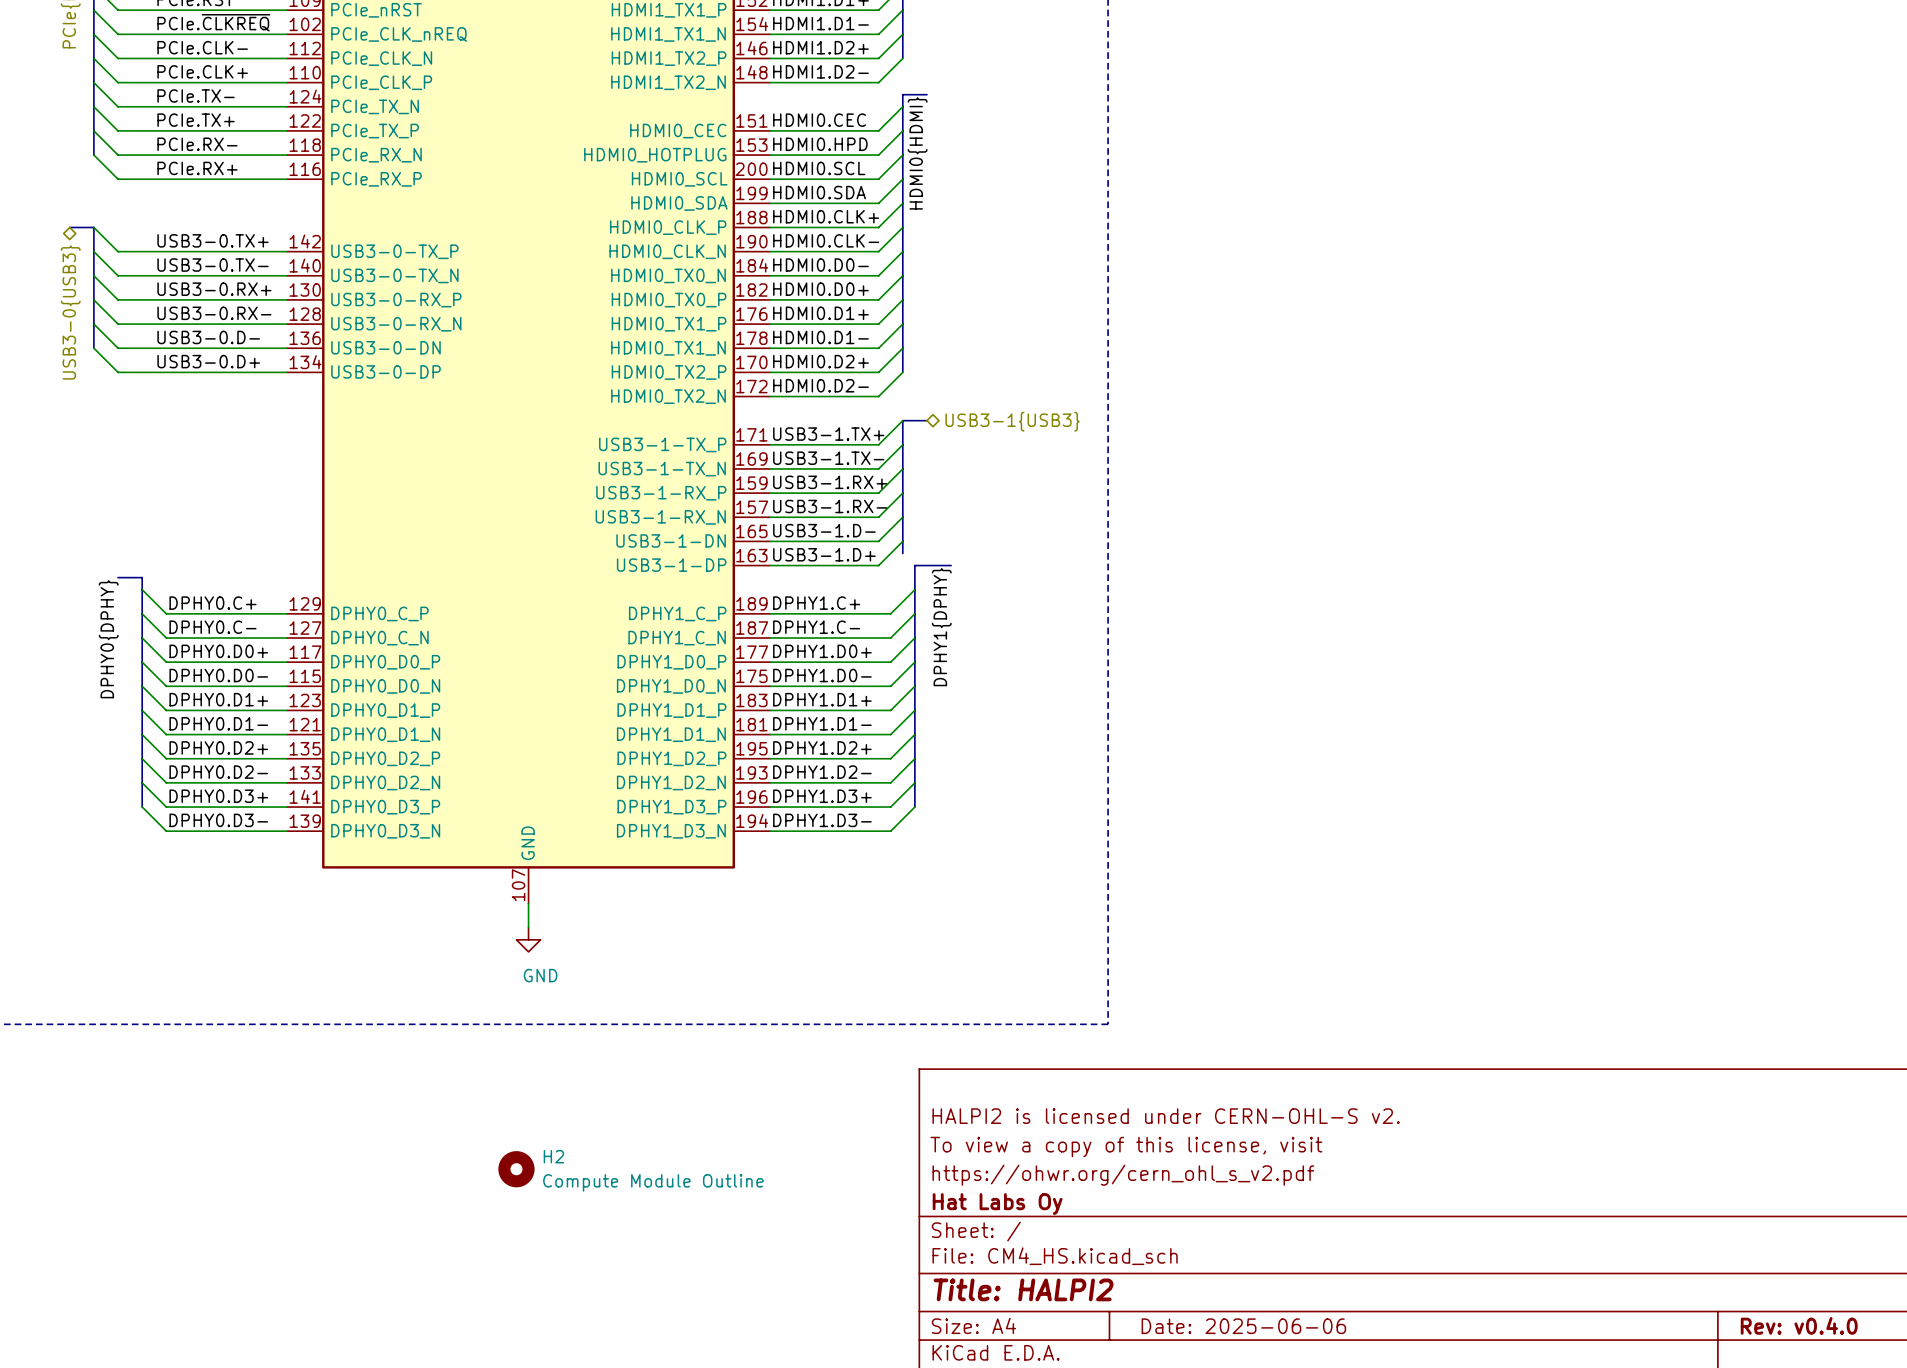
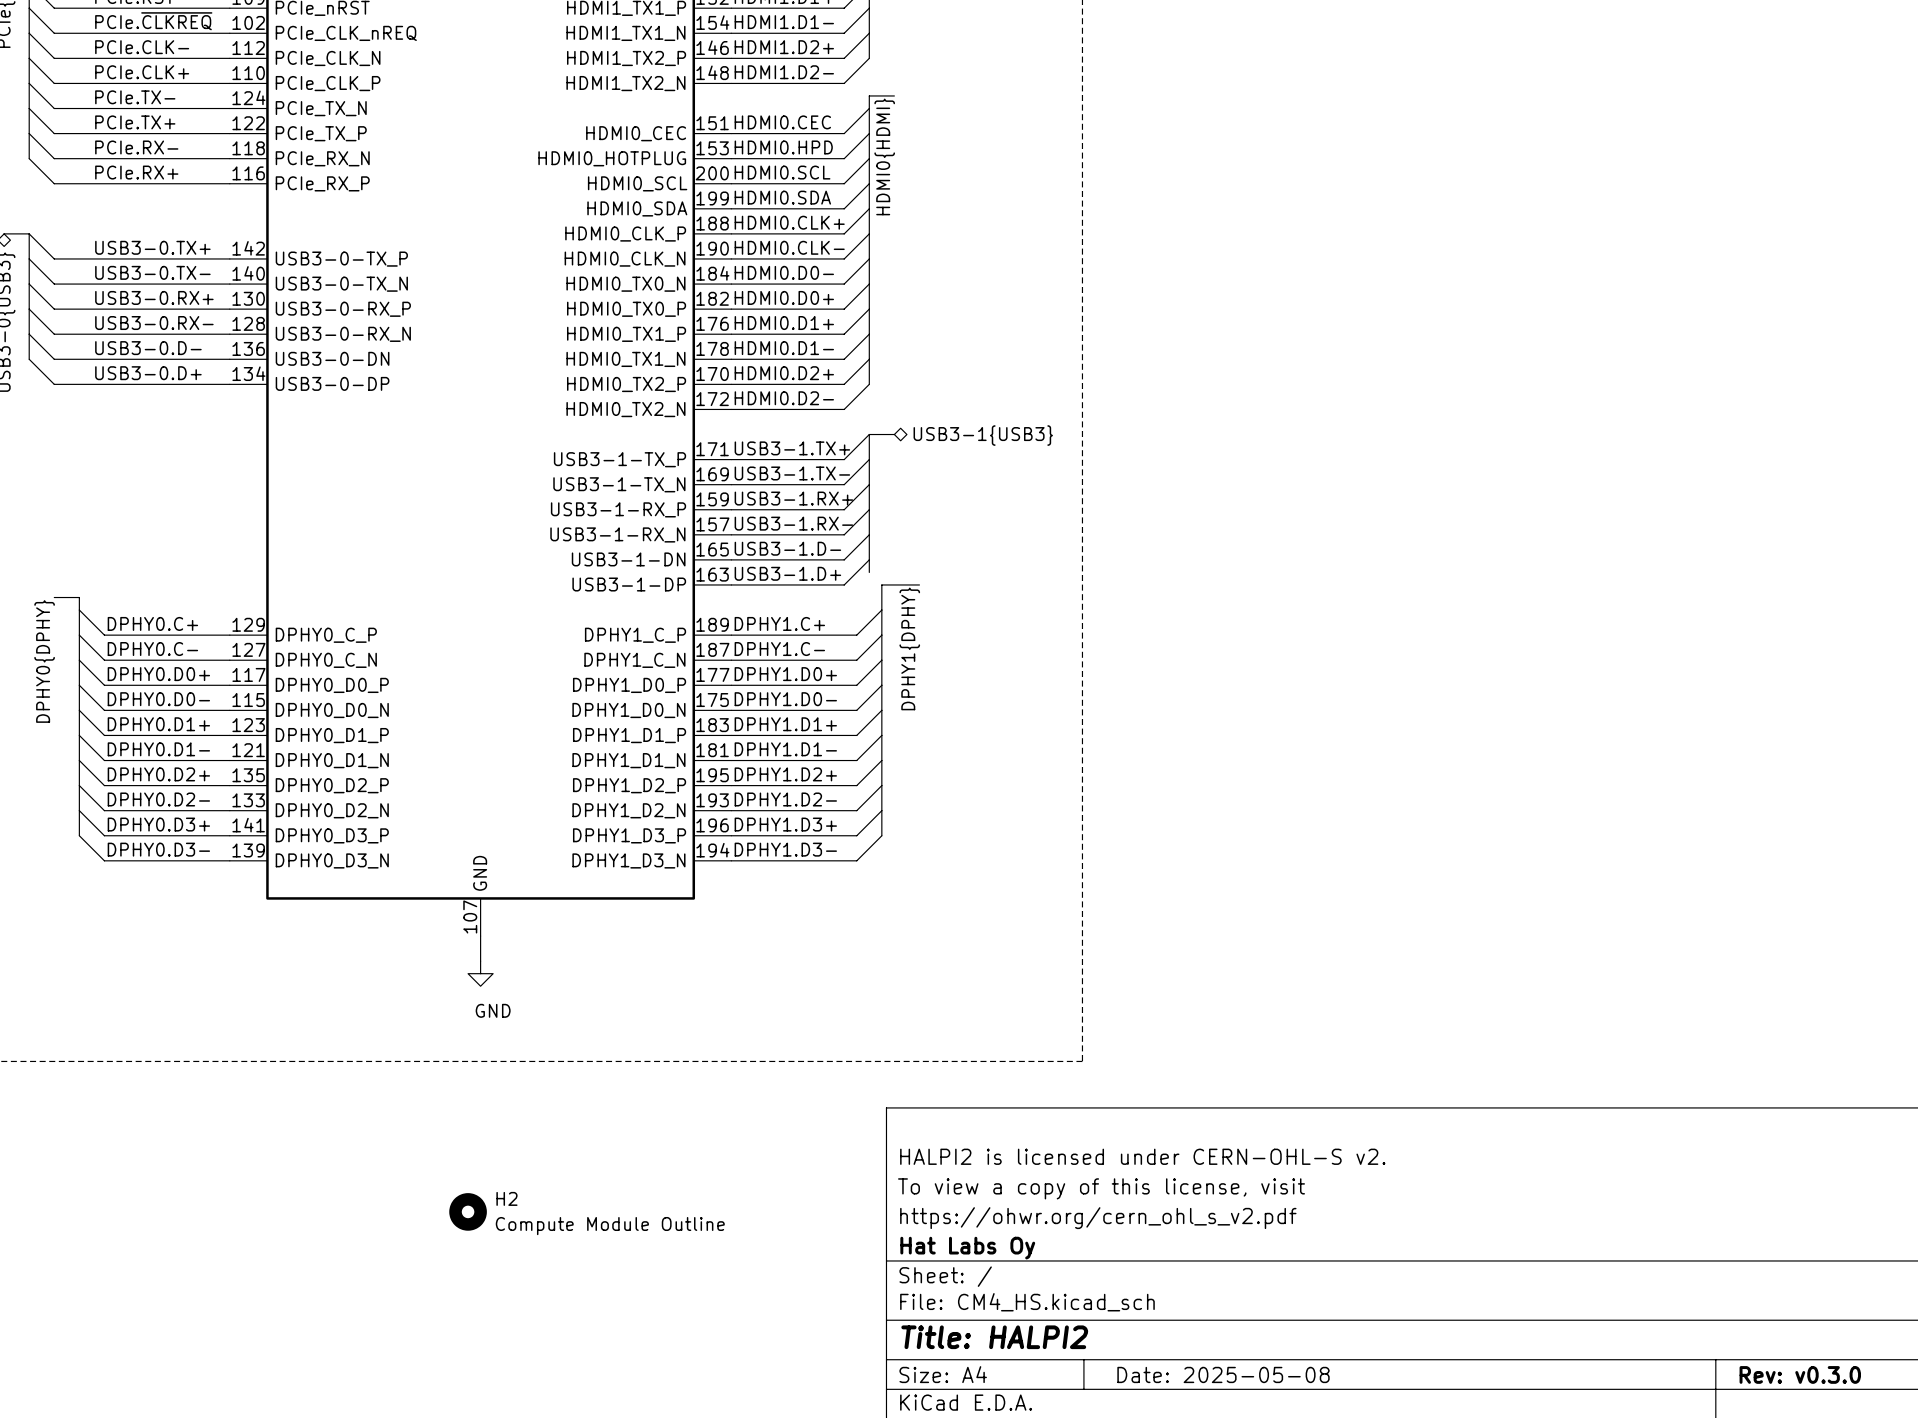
title block: Rev: v0.4.0 (1799, 1325) -> Rev: v0.3.0 (1800, 1374)
title block: Date: 2025-06-06 (1243, 1326) -> Date: 2025-05-08 (1223, 1374)

